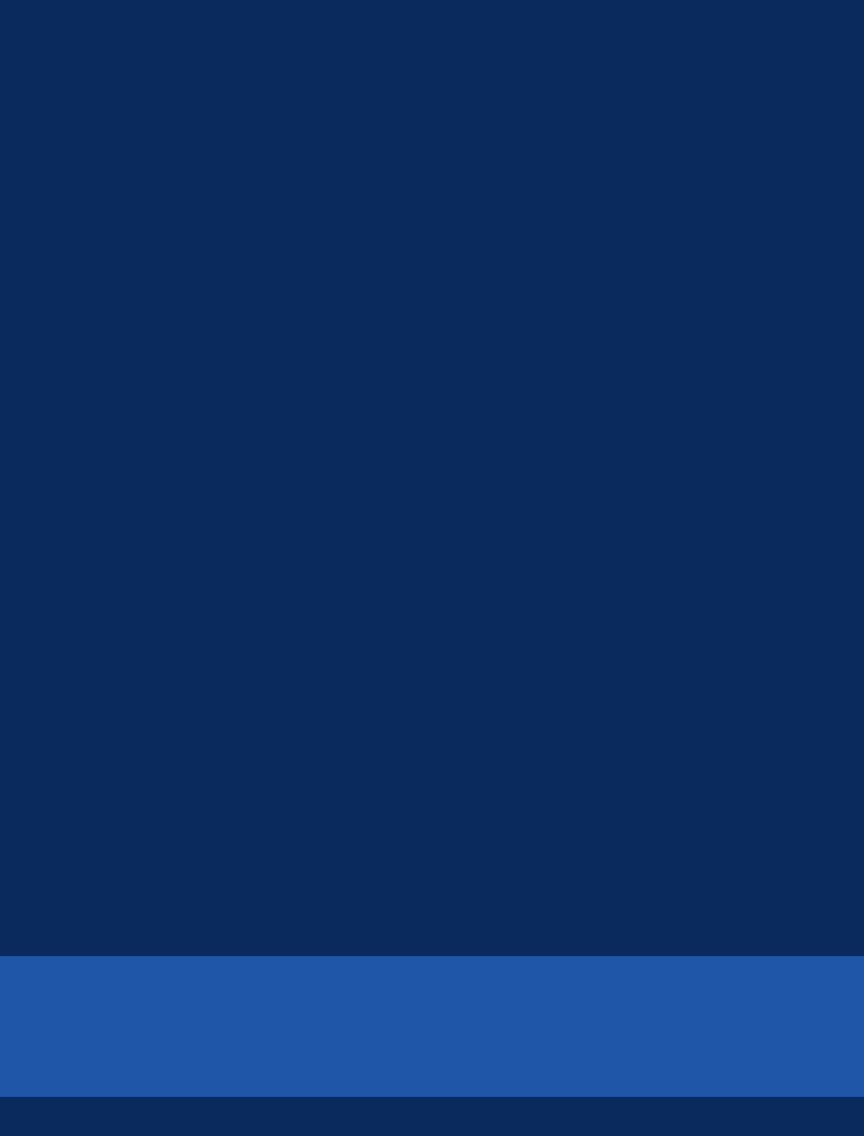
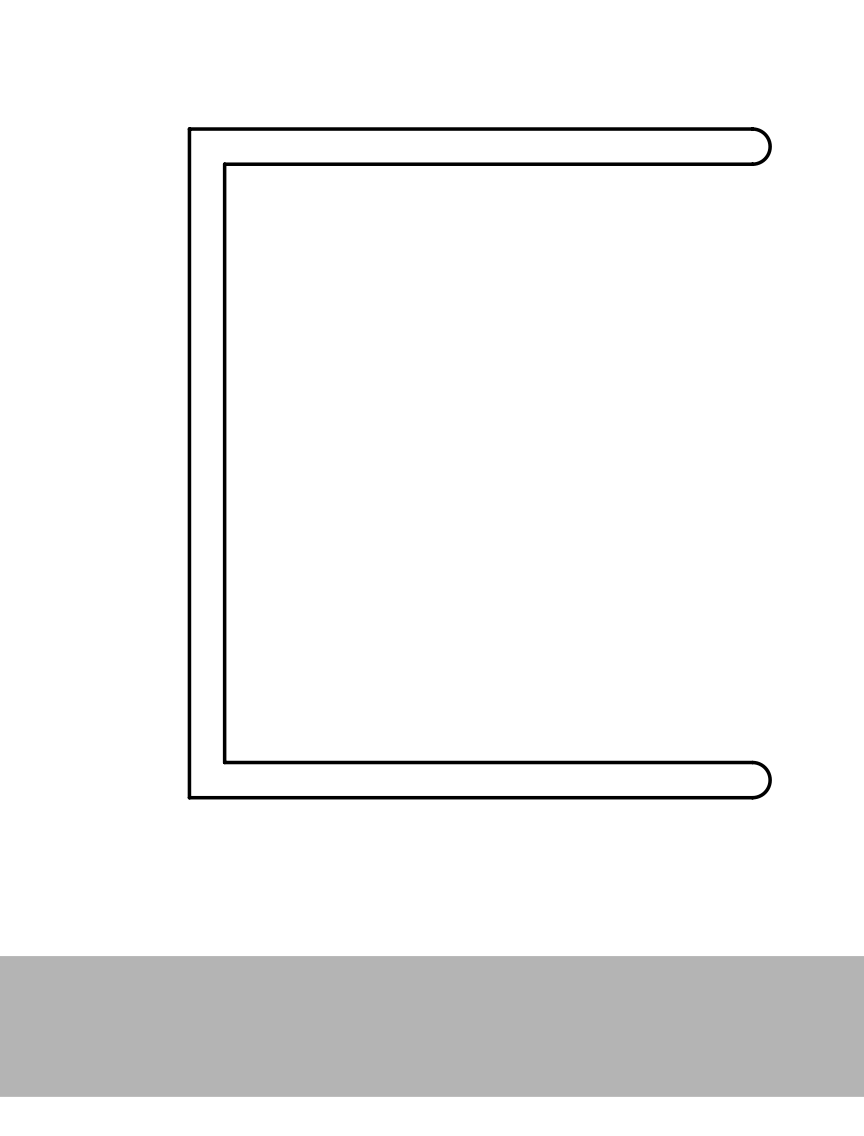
board edge: none -> (752, 129) (189, 129) (189, 797) (752, 797) (759, 796) (766, 790) (769, 782) (768, 773) (761, 764) (752, 762) (224, 762) (224, 164) (754, 164) (766, 157) (770, 146) (764, 134) (752, 129)

